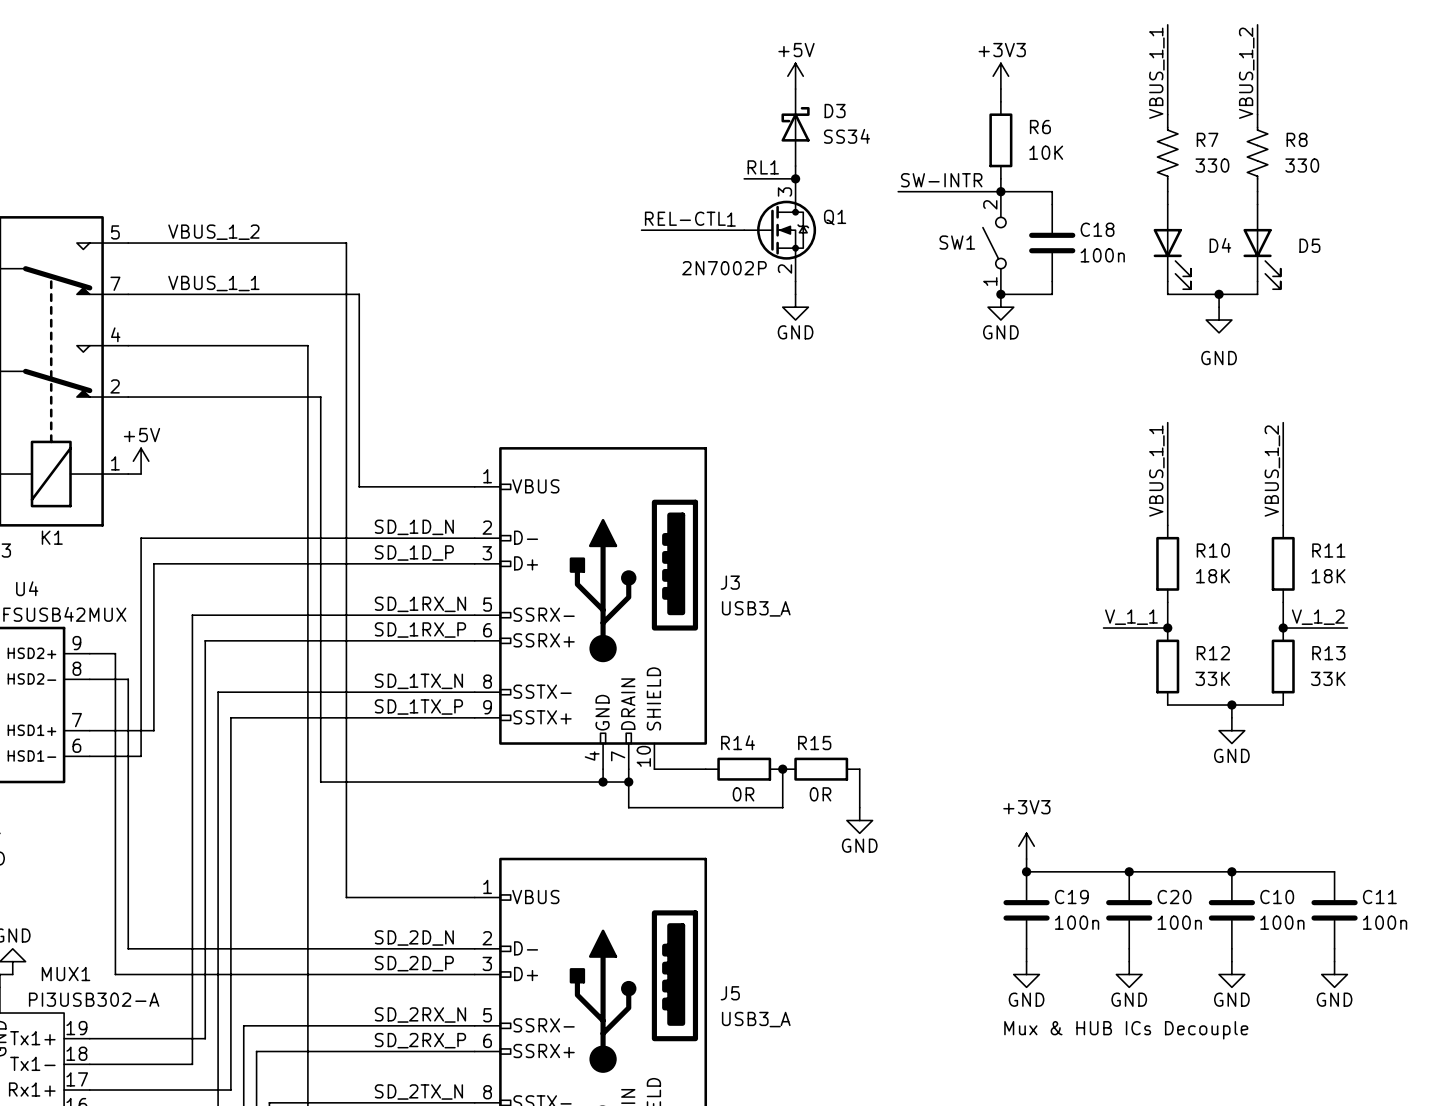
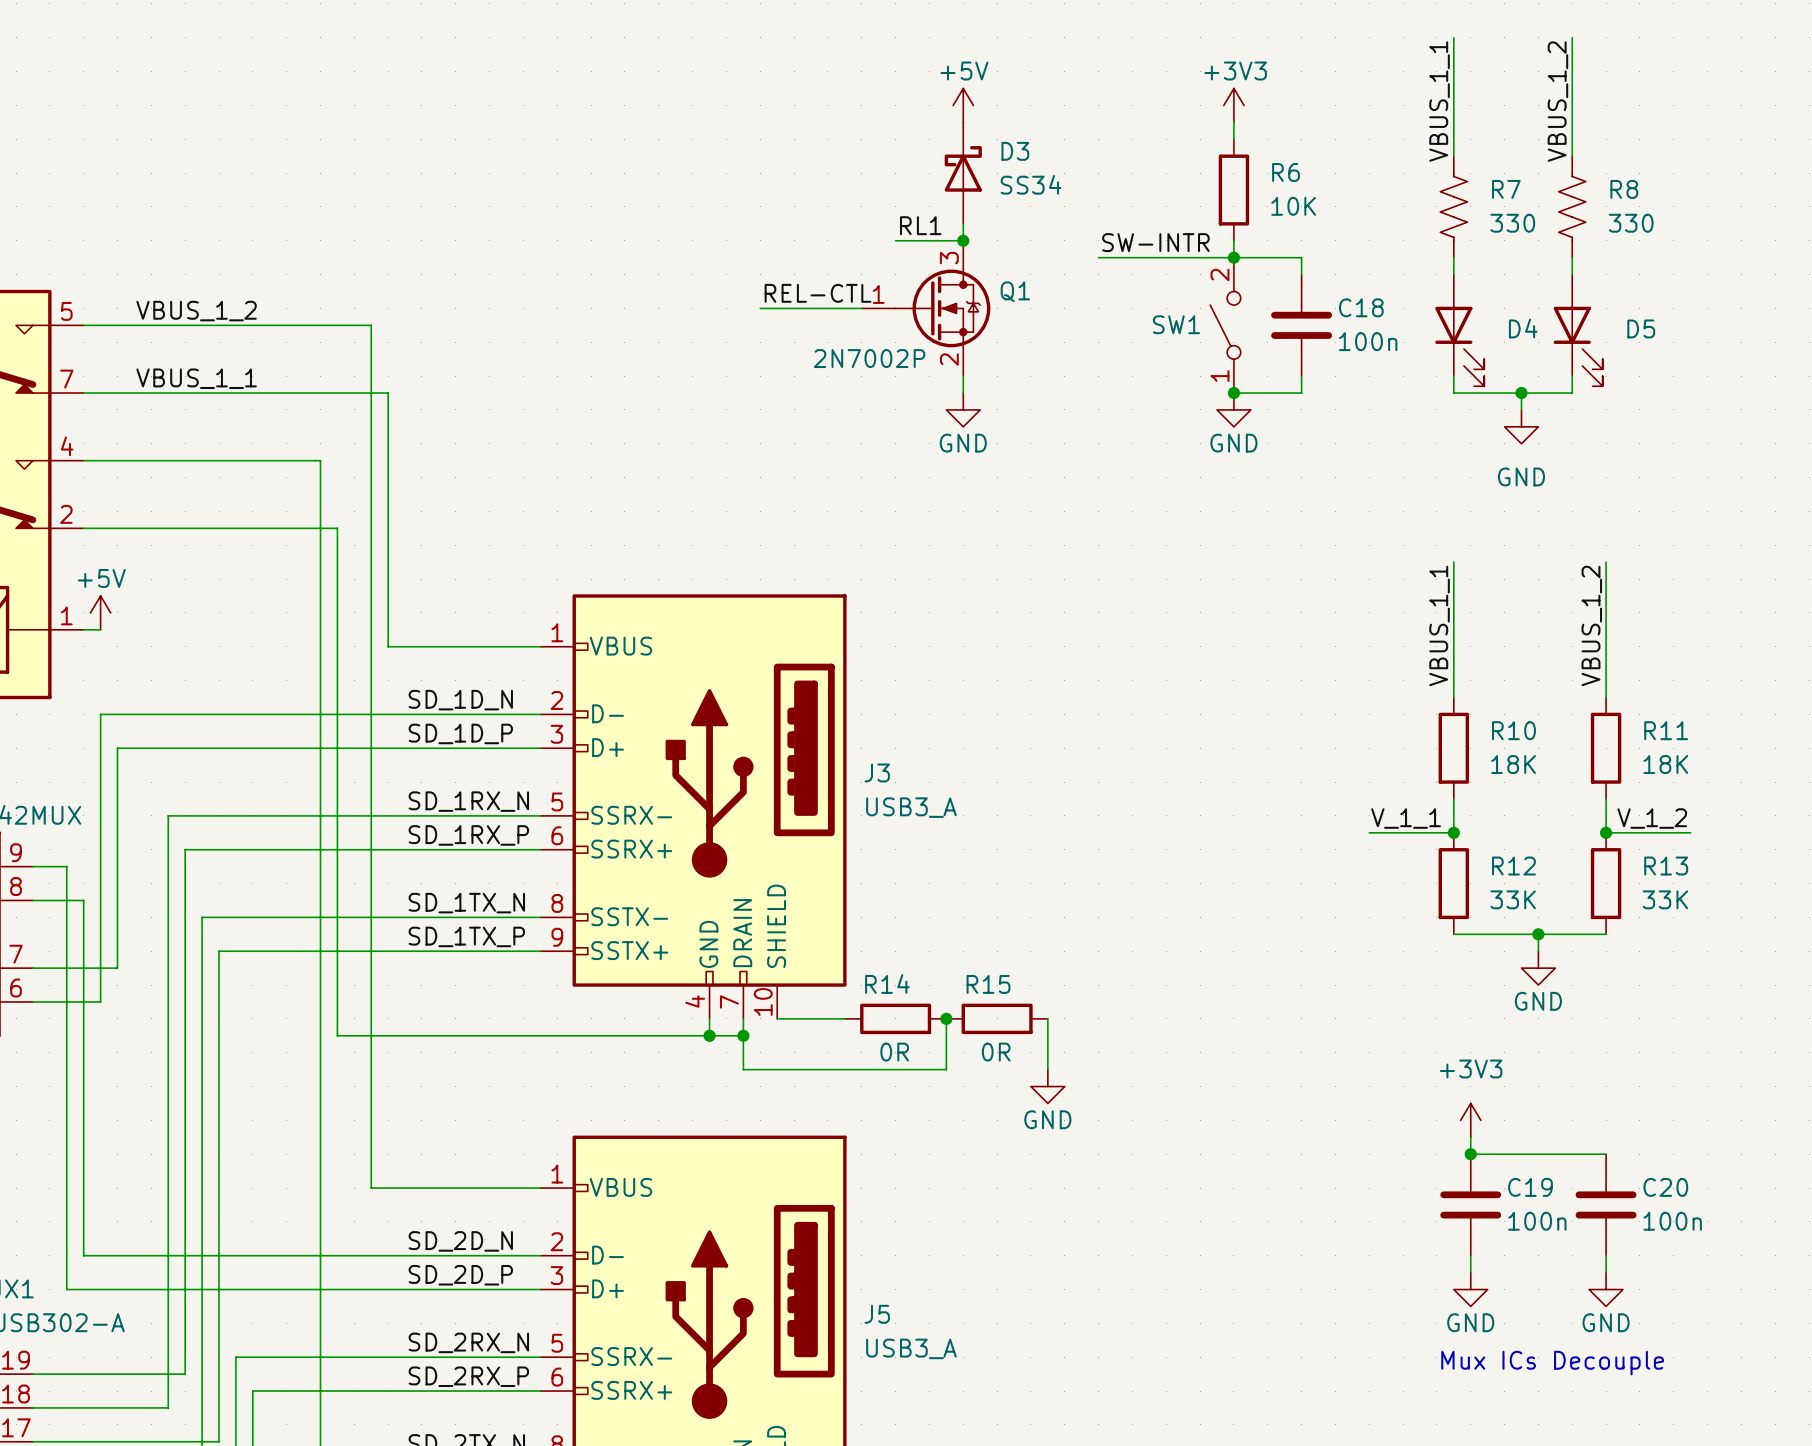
power symbol position: +3V3 (1026, 846) -> +3V3 (1470, 1120)
wire: (1026, 859) (1026, 871) (1180, 871) -> (1470, 1137) (1470, 1154)
junction: (1026, 871) -> none
junction: (1129, 871) -> none
junction: none -> (1470, 1154)
junction: (1231, 871) -> none
wire: (1283, 871) (1334, 871) -> none
C19 position: (1026, 910) -> (1470, 1204)
C20 position: (1129, 910) -> (1606, 1204)
C10: 100n (1231, 910) -> none
C11: 100n (1334, 910) -> none
wire: (1026, 948) (1026, 961) -> none
wire: (1129, 948) (1129, 961) -> (1470, 1255) (1470, 1272)
wire: (1231, 948) (1231, 961) -> (1606, 1255) (1606, 1272)
wire: (1334, 948) (1334, 961) -> none
power symbol: GND (1026, 974) -> none
power symbol: GND (1129, 974) -> none
power symbol: none -> GND (1470, 1289)
power symbol: GND (1231, 974) -> none
power symbol: none -> GND (1606, 1289)
power symbol: GND (1334, 974) -> none
text: Mux & HUB ICs Decouple (1126, 1030) -> Mux ICs Decouple (1552, 1363)

